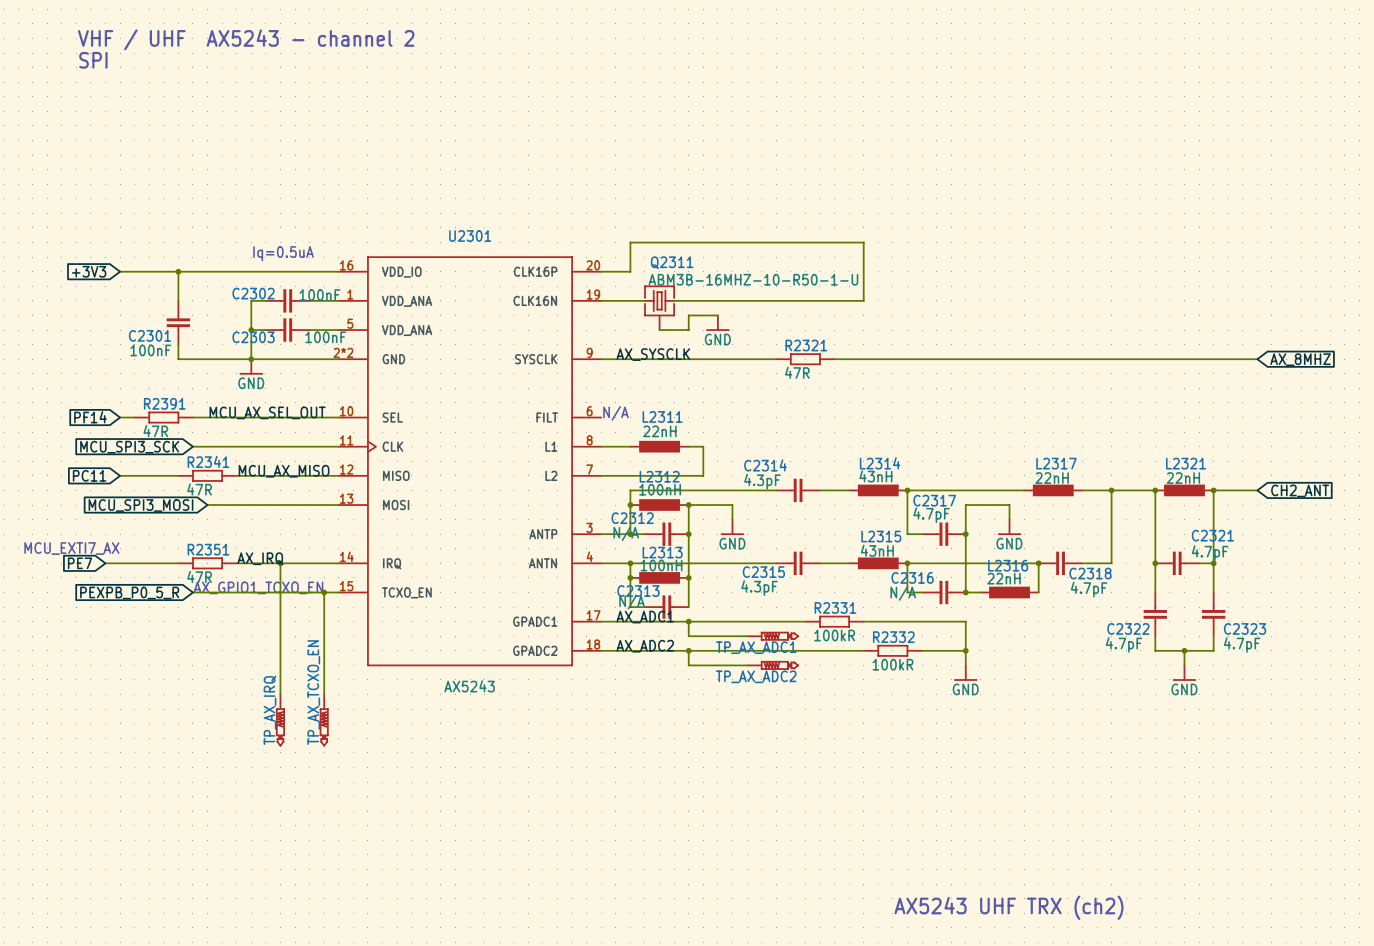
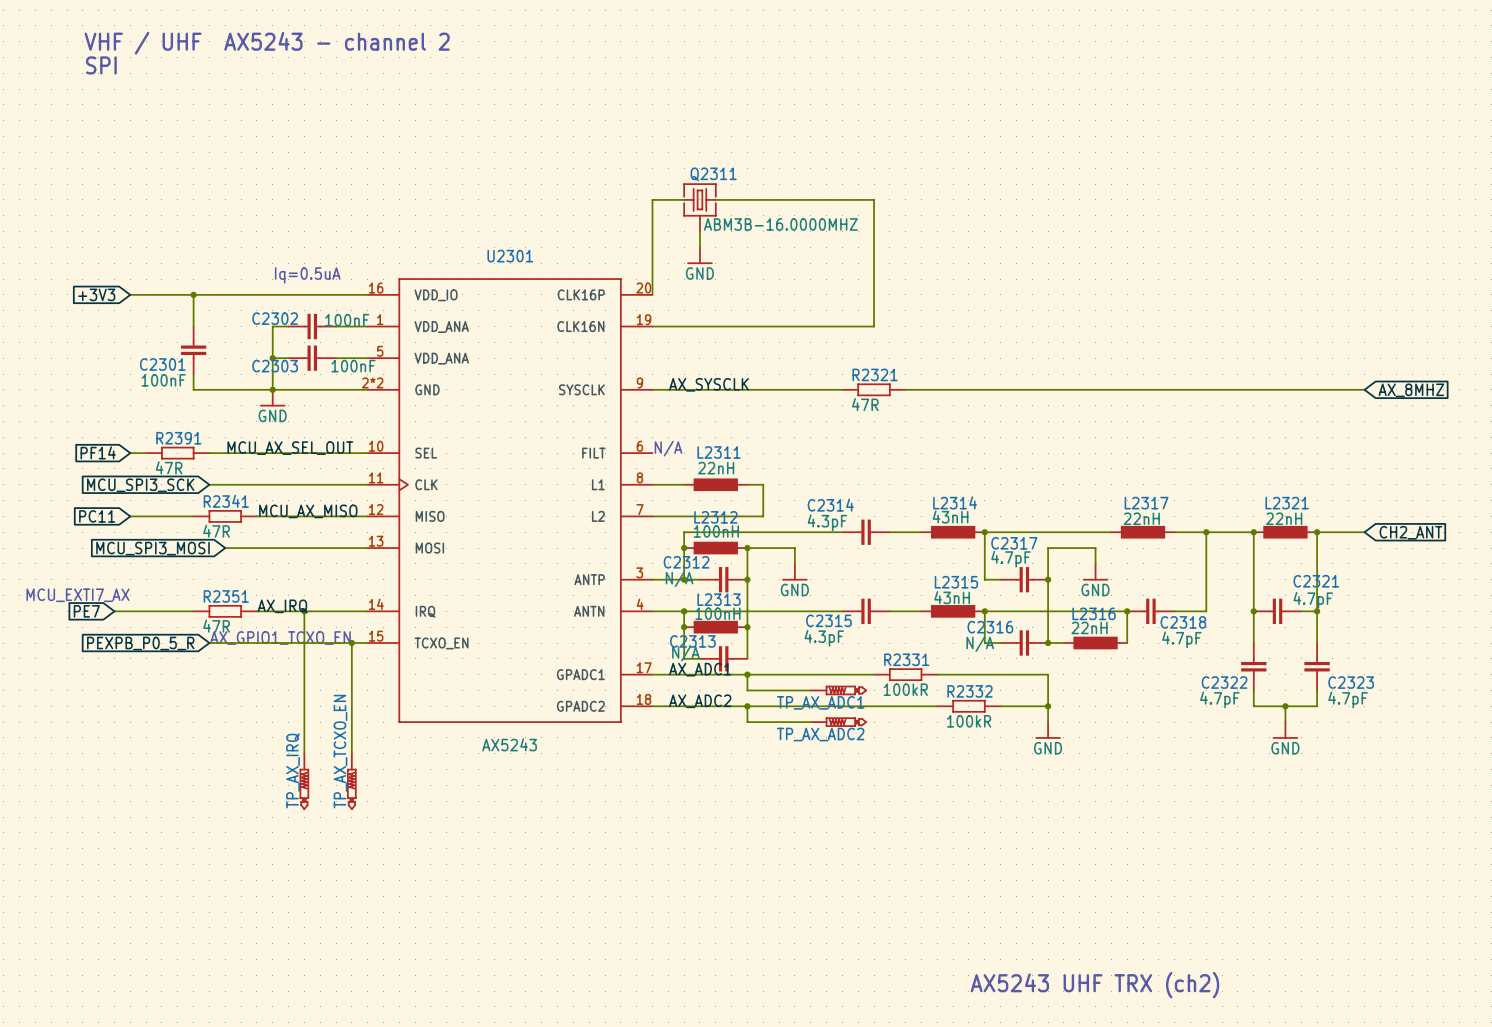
wire: none -> (684, 199) (652, 199) (652, 294)
wire: none -> (699, 231) (699, 247)
Q2311 name position: Q2311 (672, 262) -> Q2311 (713, 174)
wire: (601, 271) (630, 271) (630, 242) (863, 242) (863, 300) (805, 300) -> (715, 199) (874, 199) (874, 326)
Q2311 value: ABM3B-16MHZ-10-R50-1-U (753, 279) -> ABM3B-16.0000MHZ (780, 224)
Q2311 position: (659, 307) -> (699, 207)
wire: (717, 315) (688, 315) (688, 330) (659, 330) -> none
power symbol position: GND (717, 323) -> GND (699, 255)

